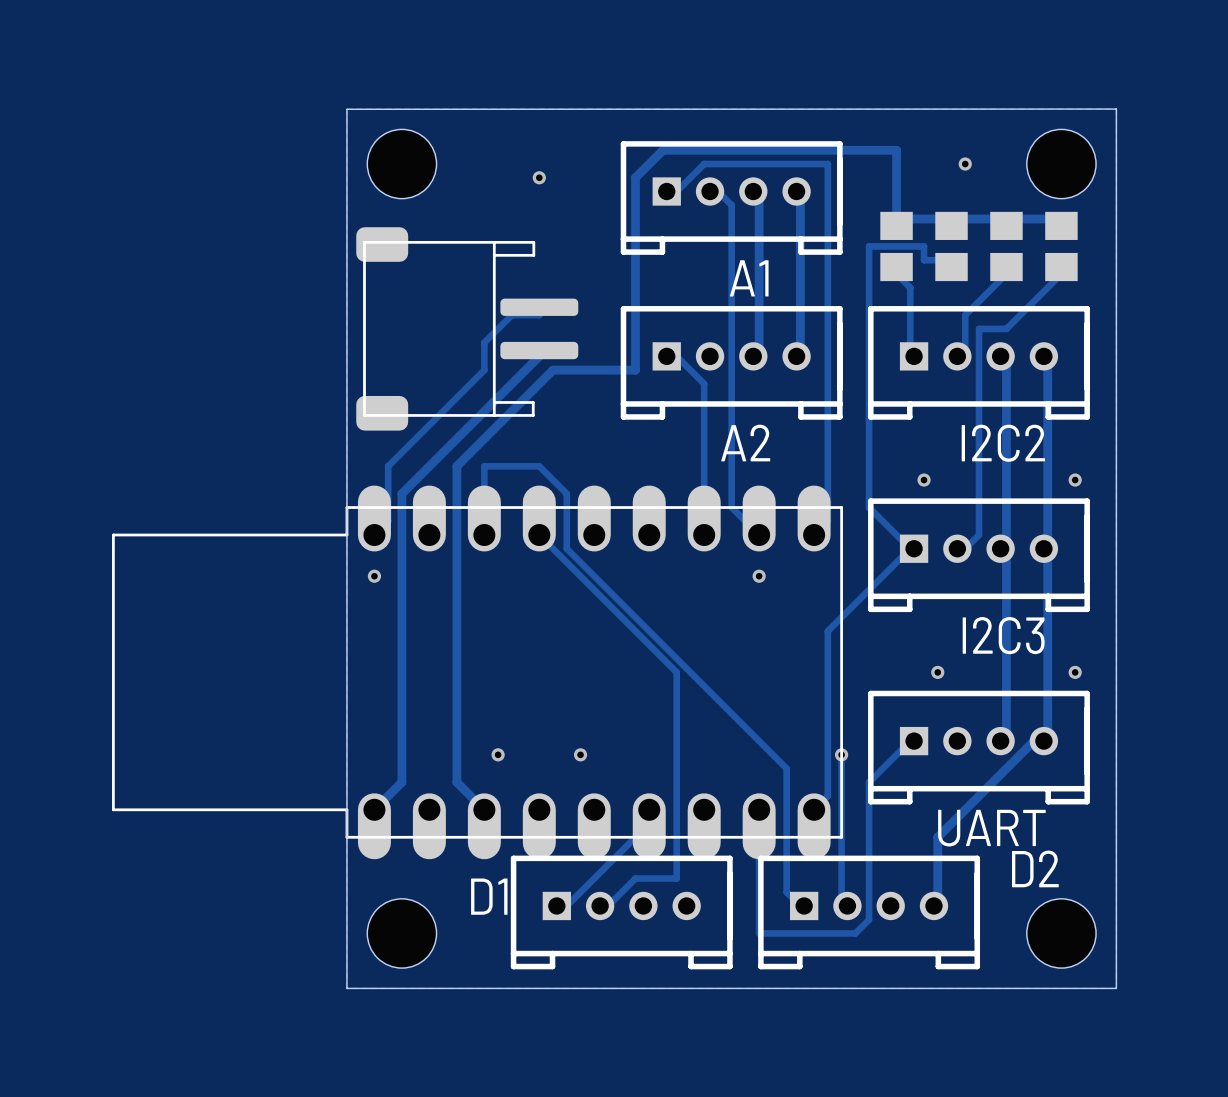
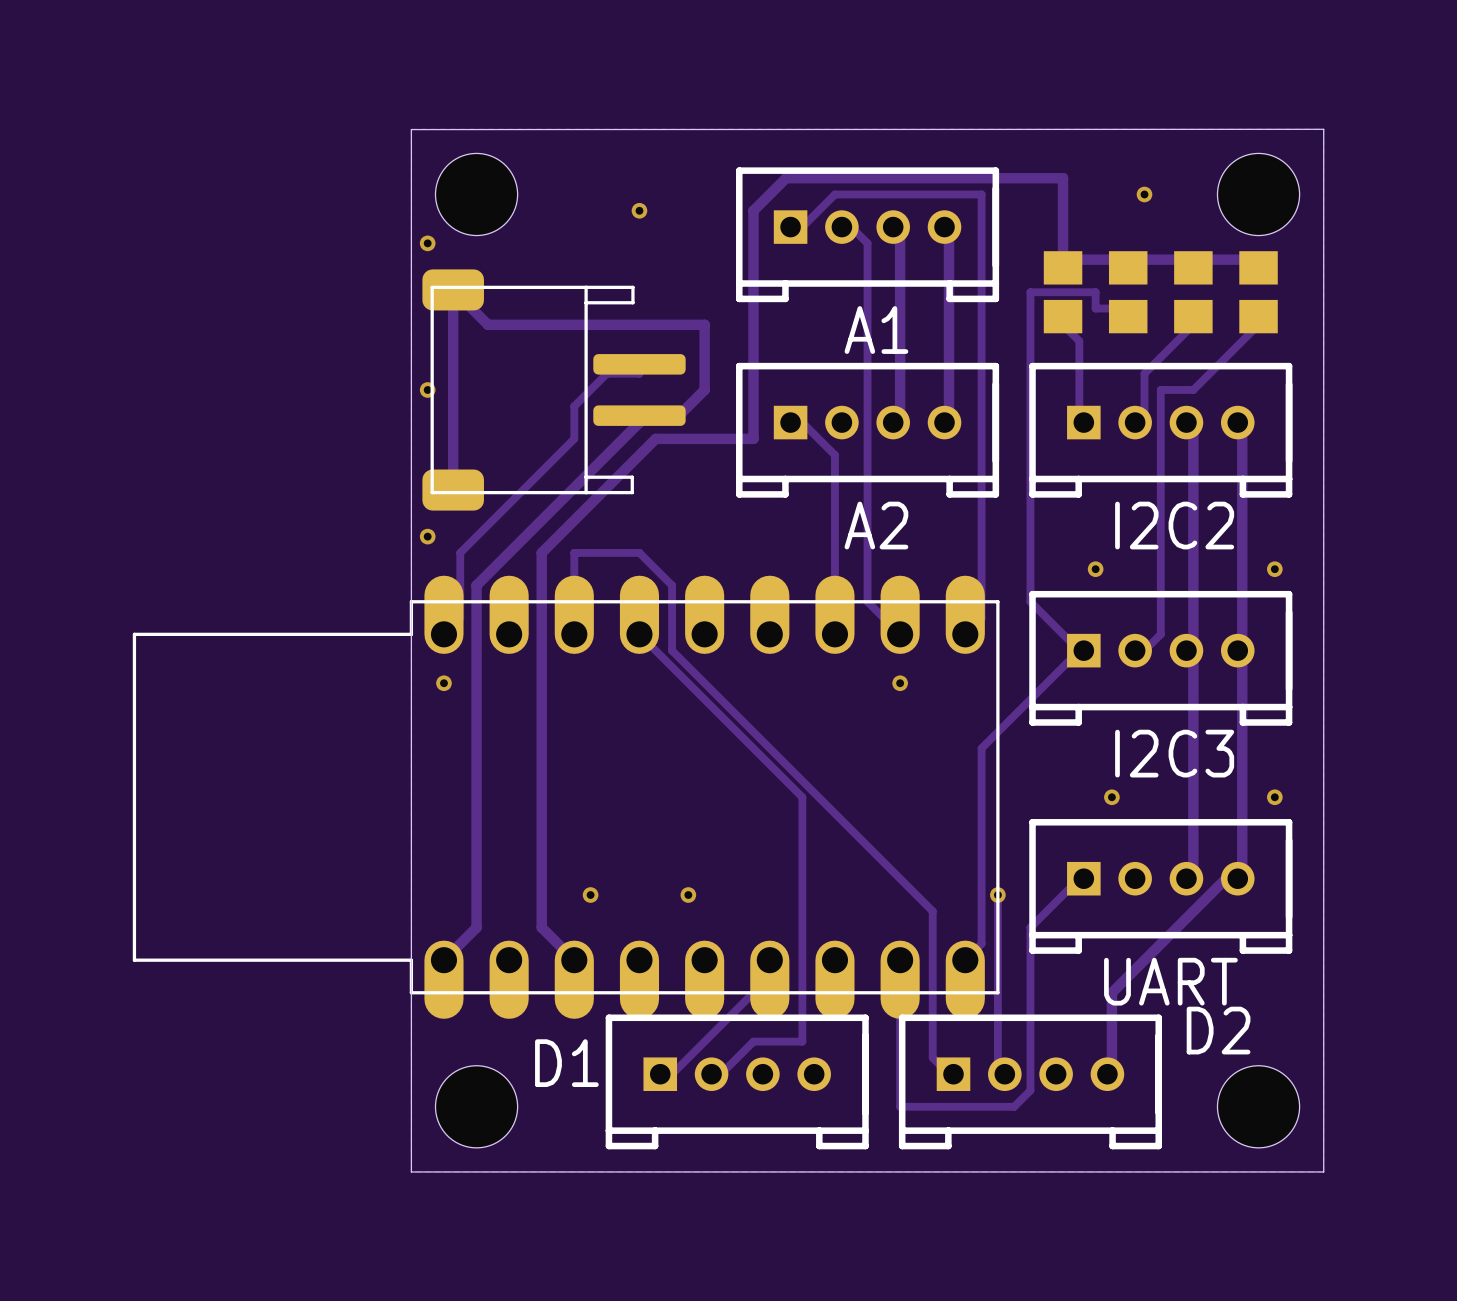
via: none -> (427, 243)
via: none -> (427, 389)
track: none -> (639, 415) (678, 415) (704, 389) (704, 324) (488, 324) (453, 289) (453, 490)
via: none -> (427, 536)

